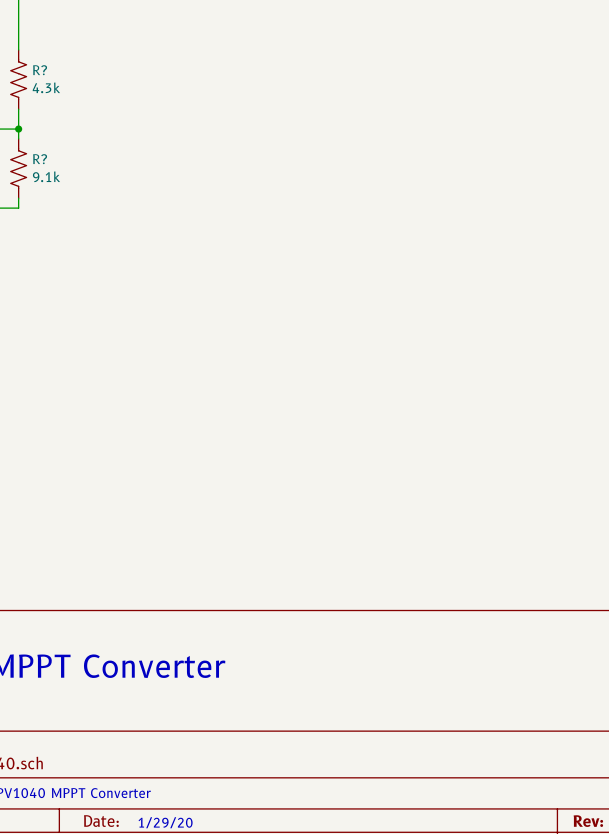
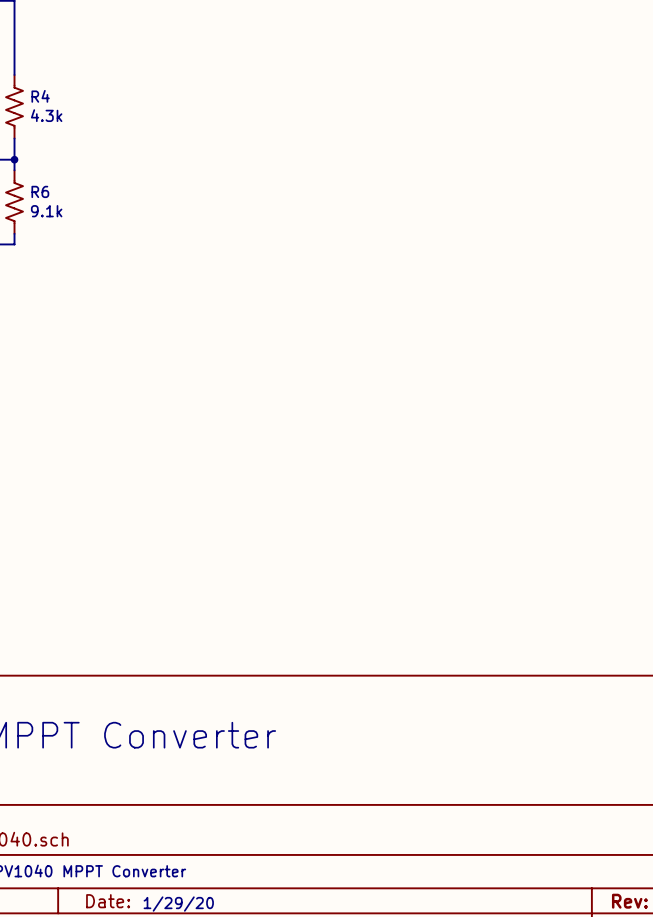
R? name: R? (40, 70) -> R4 (40, 96)
R? name: R? (40, 159) -> R6 (40, 191)

